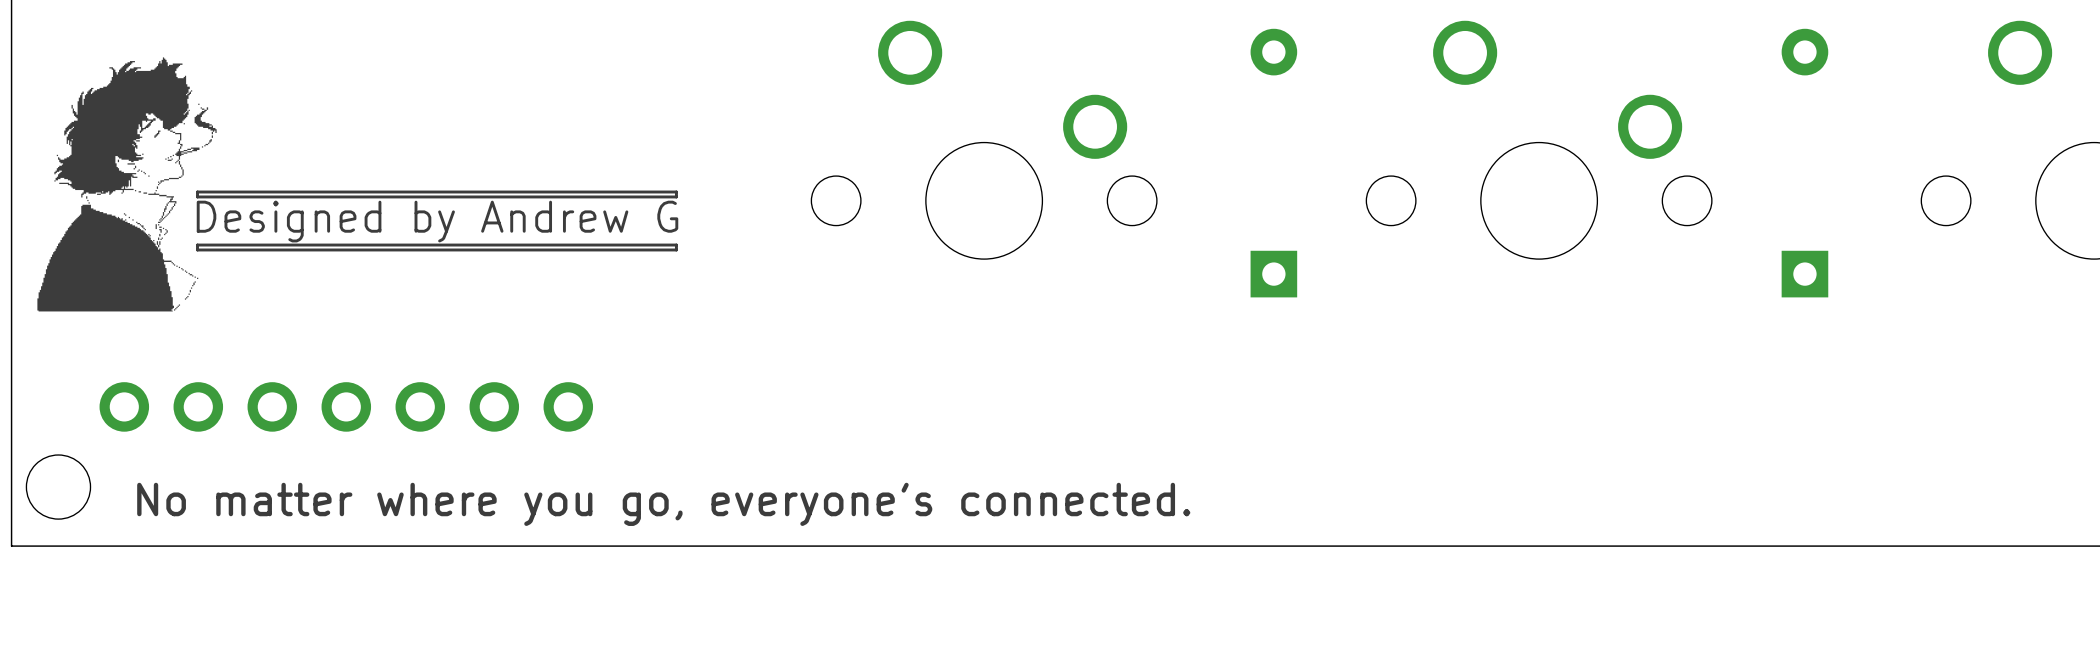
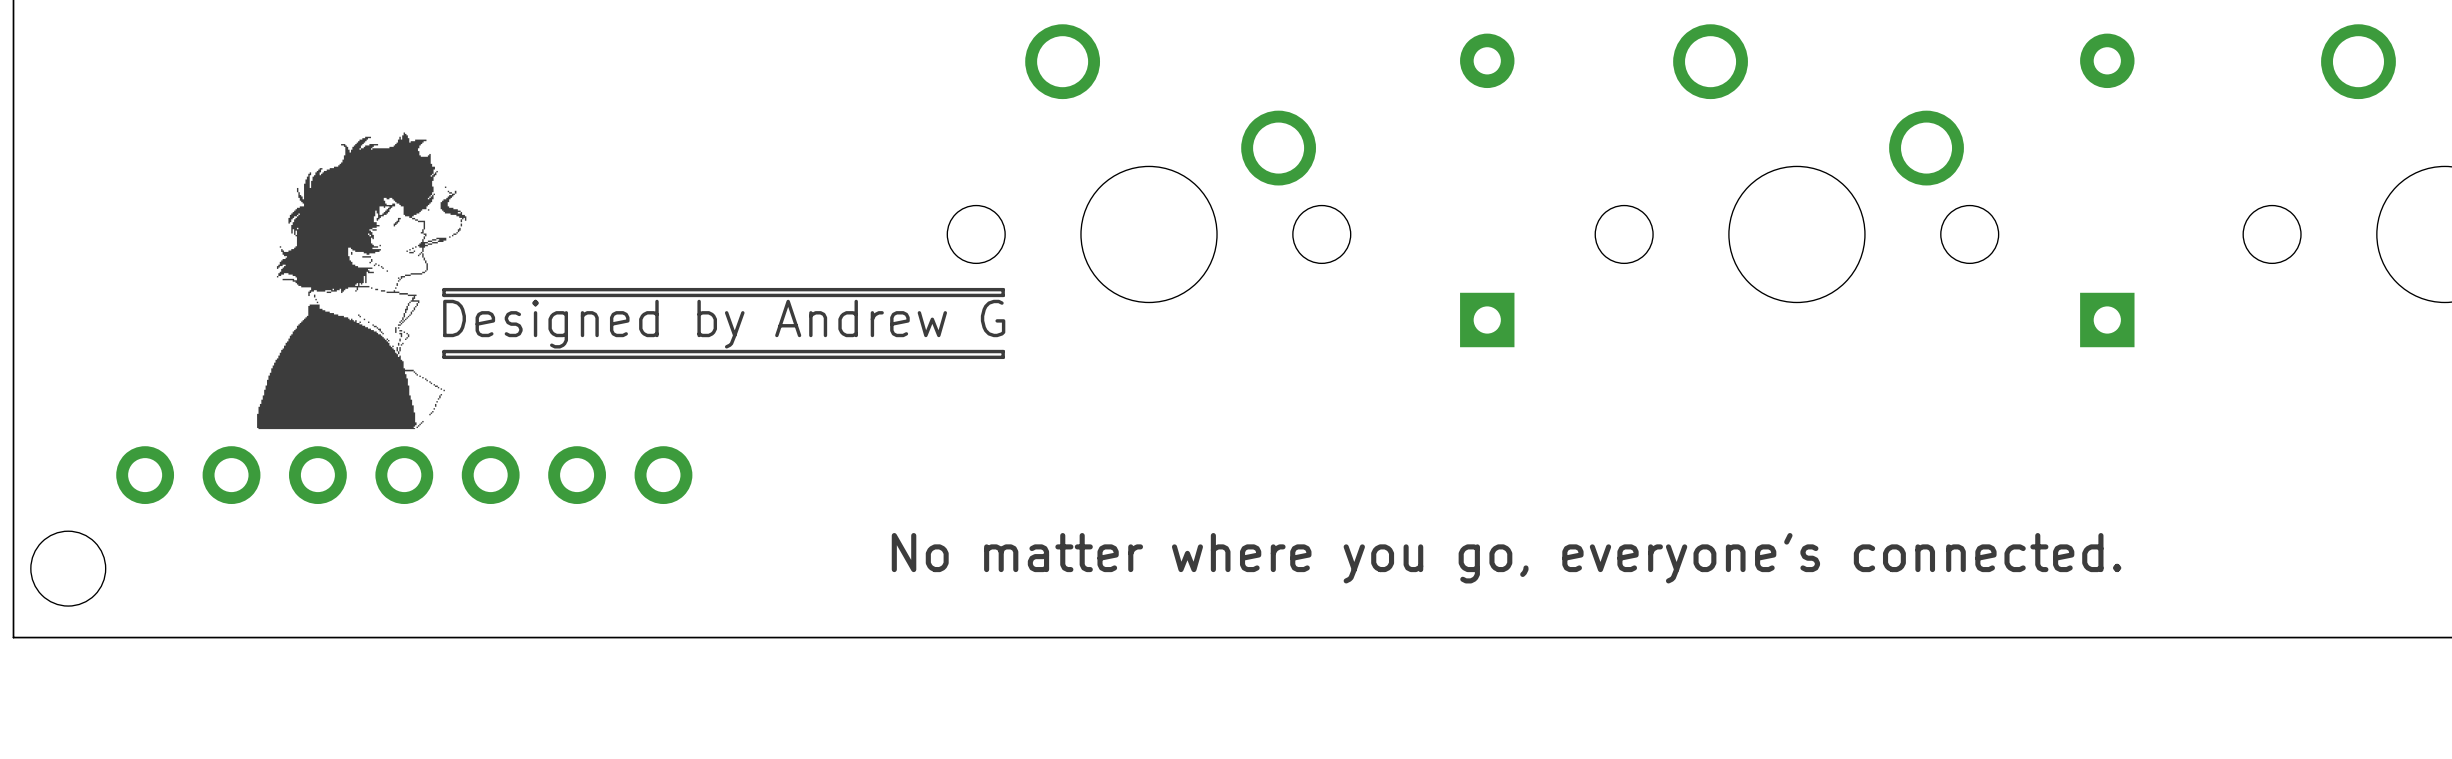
drawing position: (127, 184) -> (361, 280)
line: (676, 192) (676, 196) (197, 196) (197, 192) (676, 192) -> (1003, 351) (1003, 357) (444, 357) (444, 351) (1003, 351)
text position: Designed by Andrew G (437, 221) -> Designed by Andrew G (724, 324)
line: (676, 245) (197, 245) (197, 249) (676, 249) (676, 245) -> (1003, 289) (444, 289) (444, 295) (1003, 295) (1003, 289)
text position: No matter where you go, everyone's connected. (663, 504) -> No matter where you go, everyone's connected. (1506, 558)

